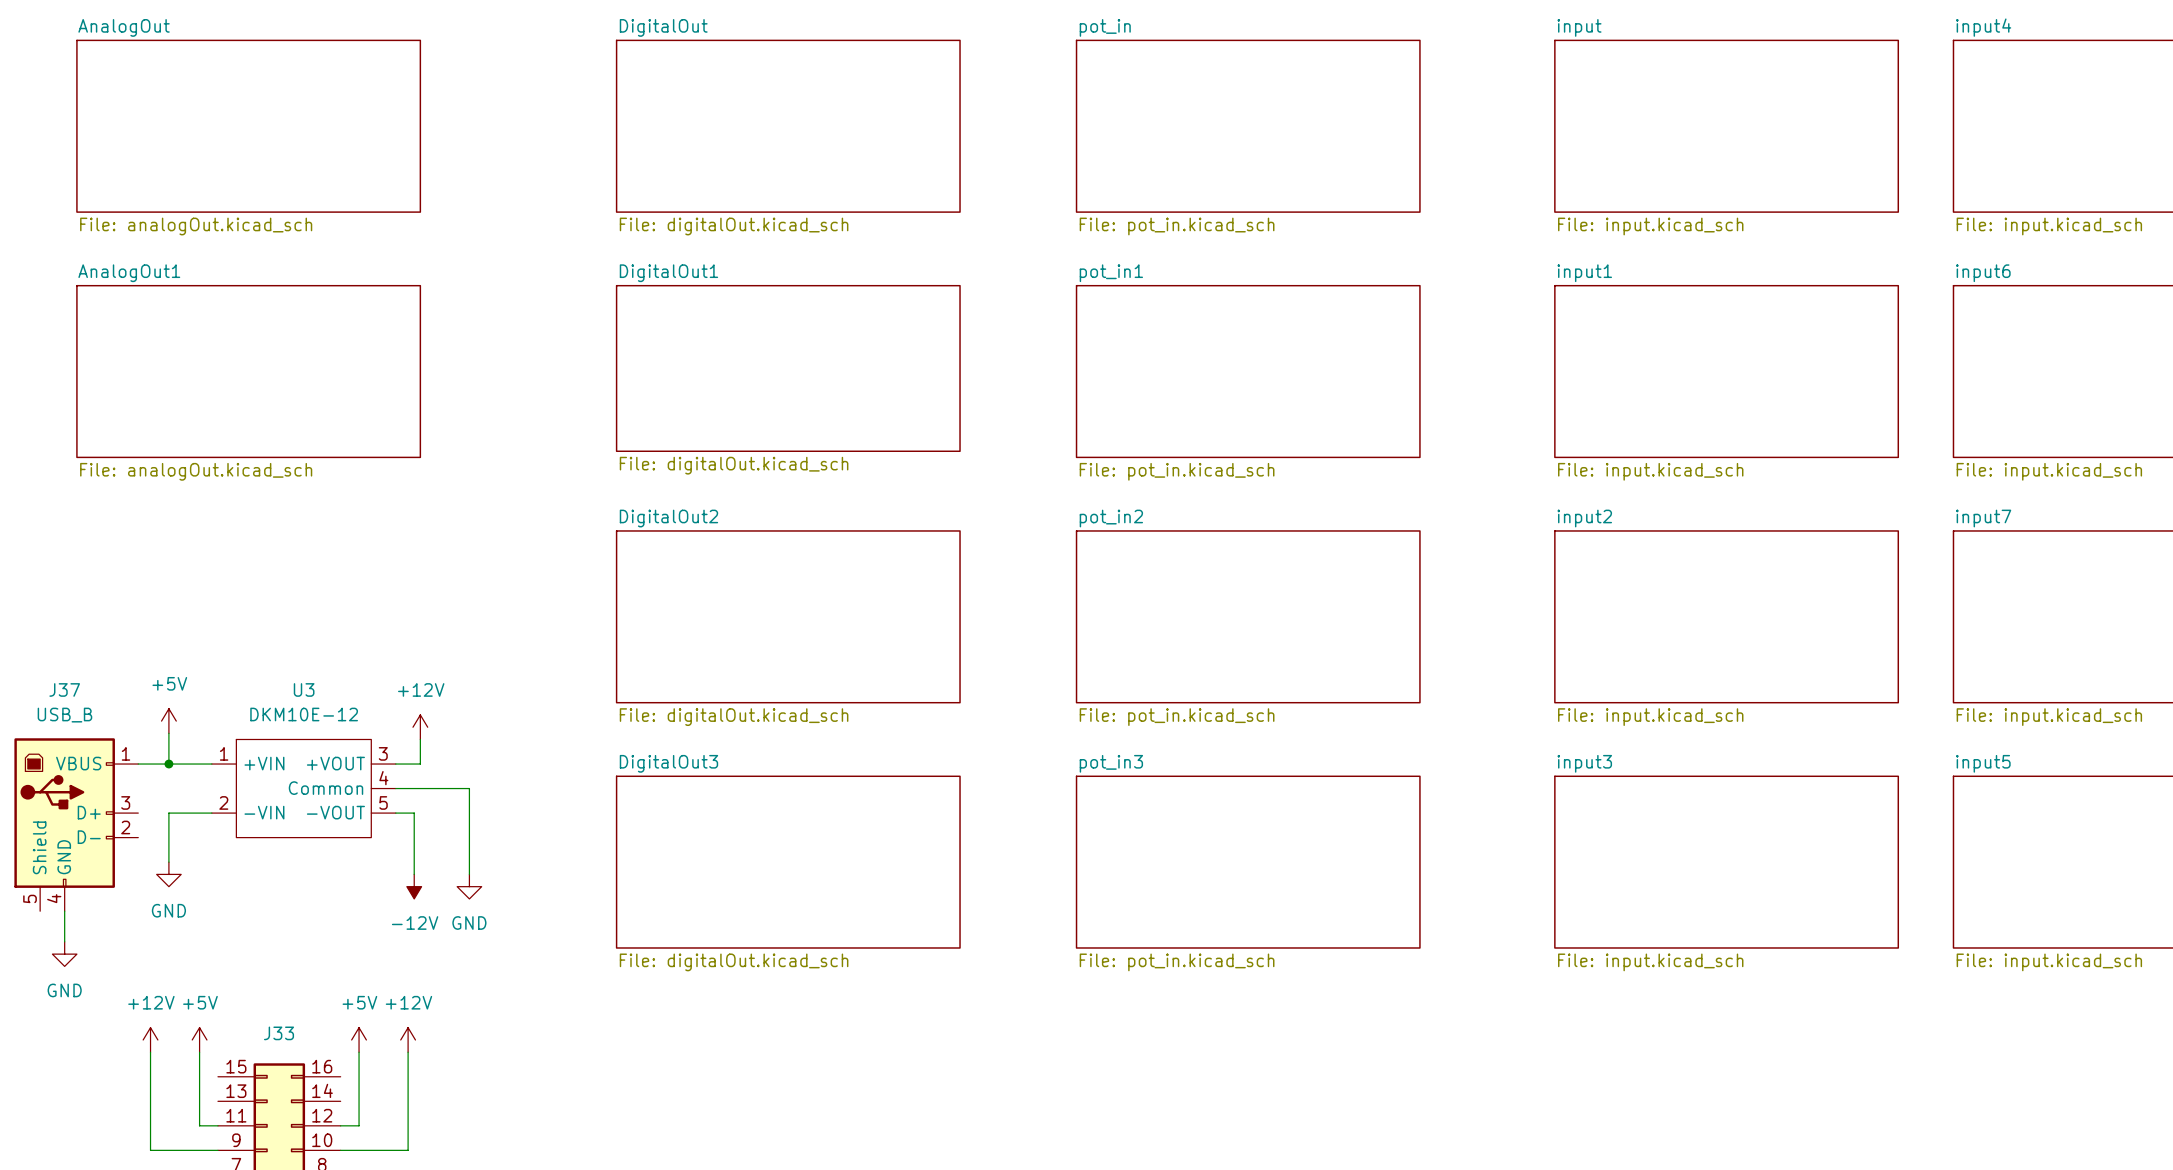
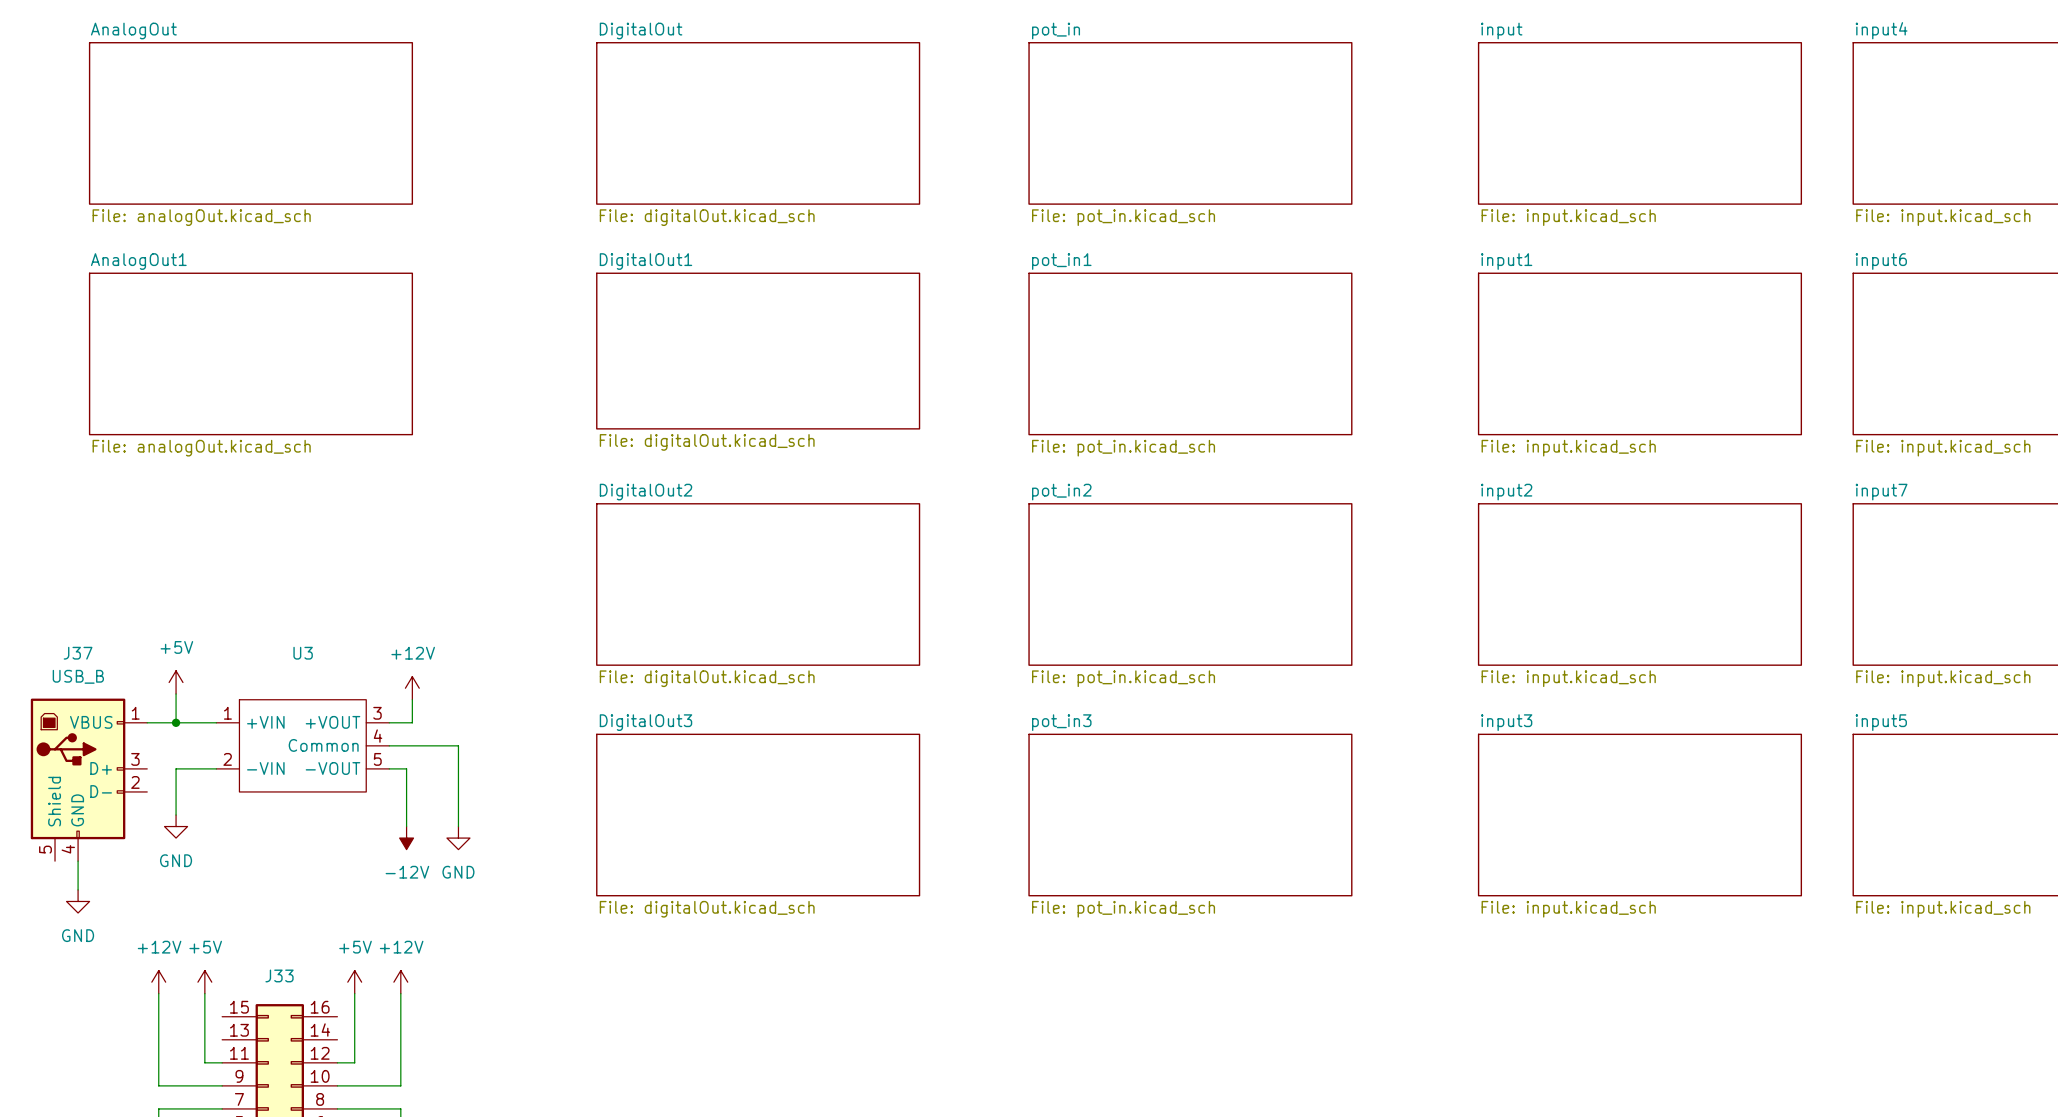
U3 value: DKM10E-12 (304, 714) -> none

